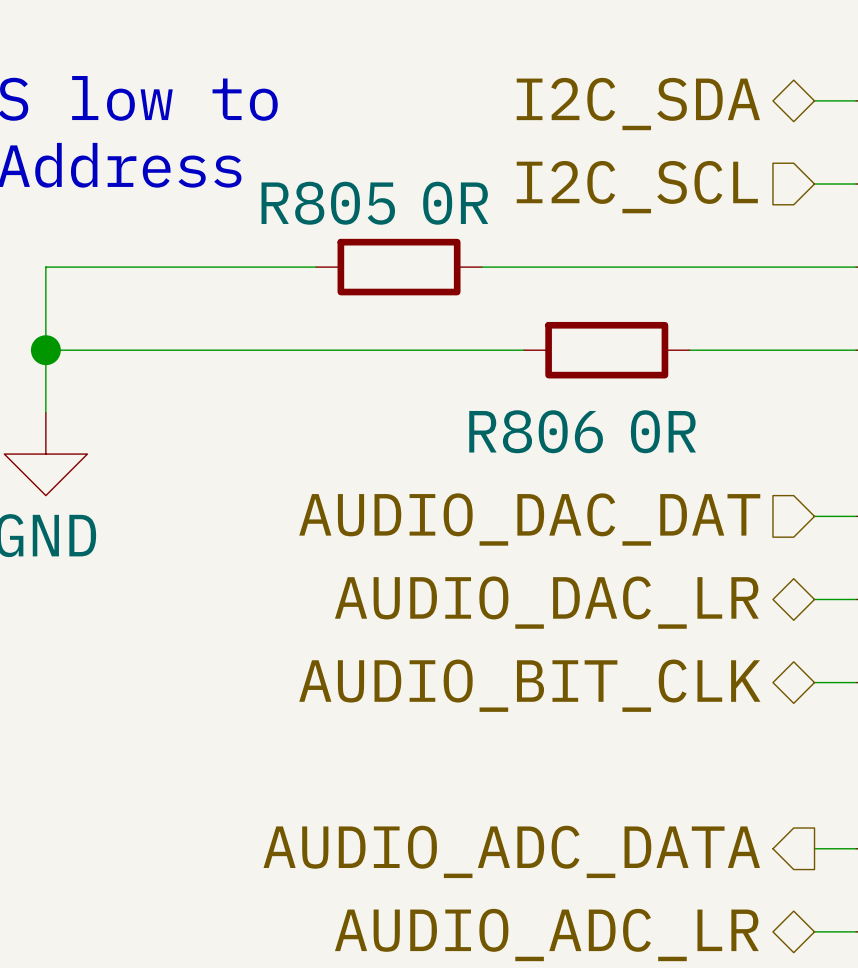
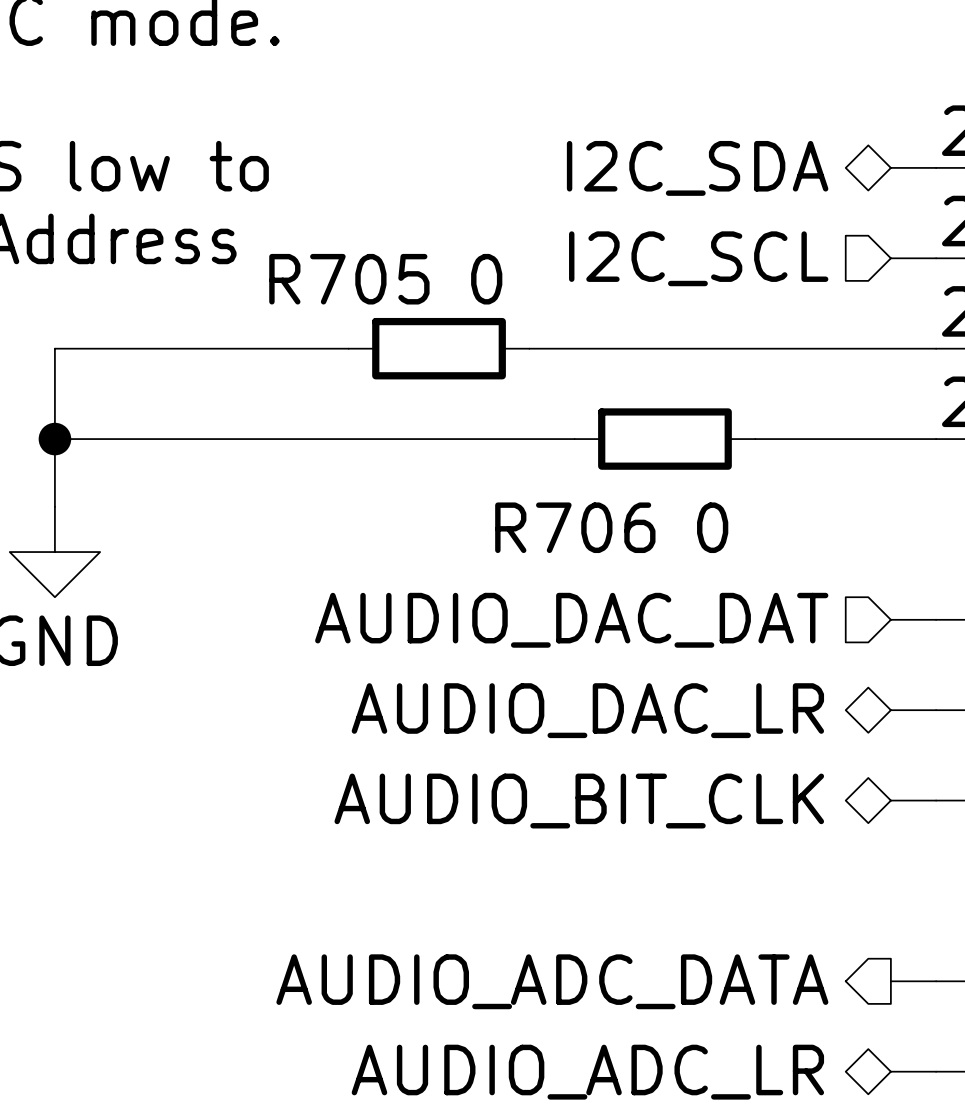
R805 name: R805 (328, 203) -> R705 (349, 279)
R805 value: 0R (455, 203) -> 0 (486, 279)
R806 name: R806 (536, 431) -> R706 (575, 527)
R806 value: 0R (663, 431) -> 0 (712, 527)

